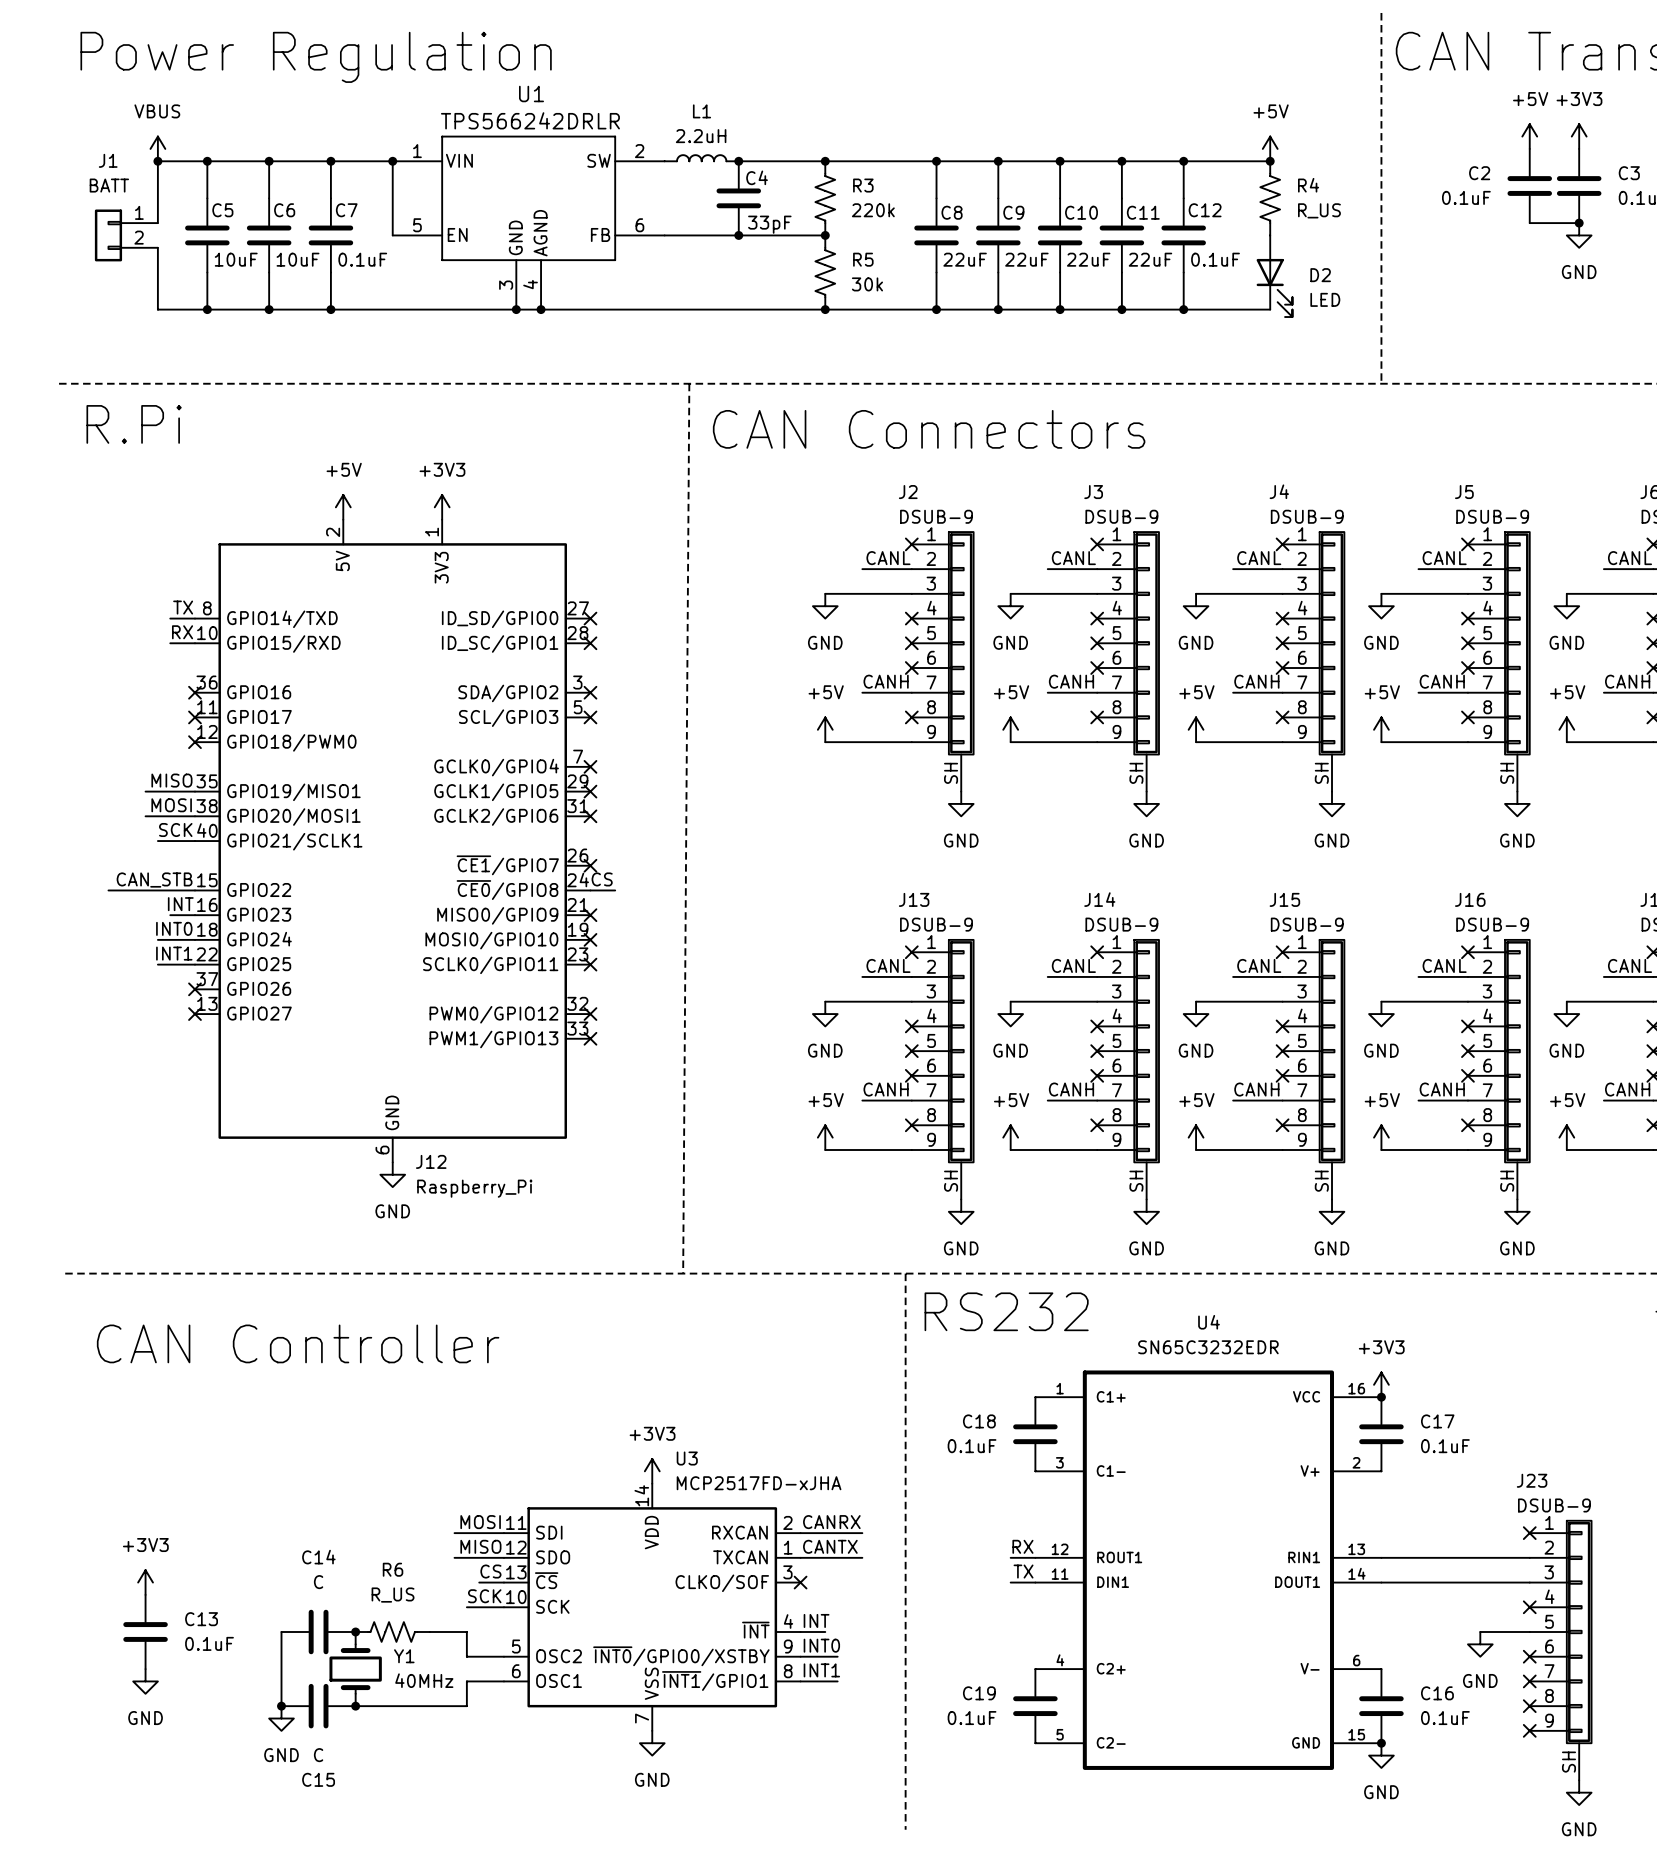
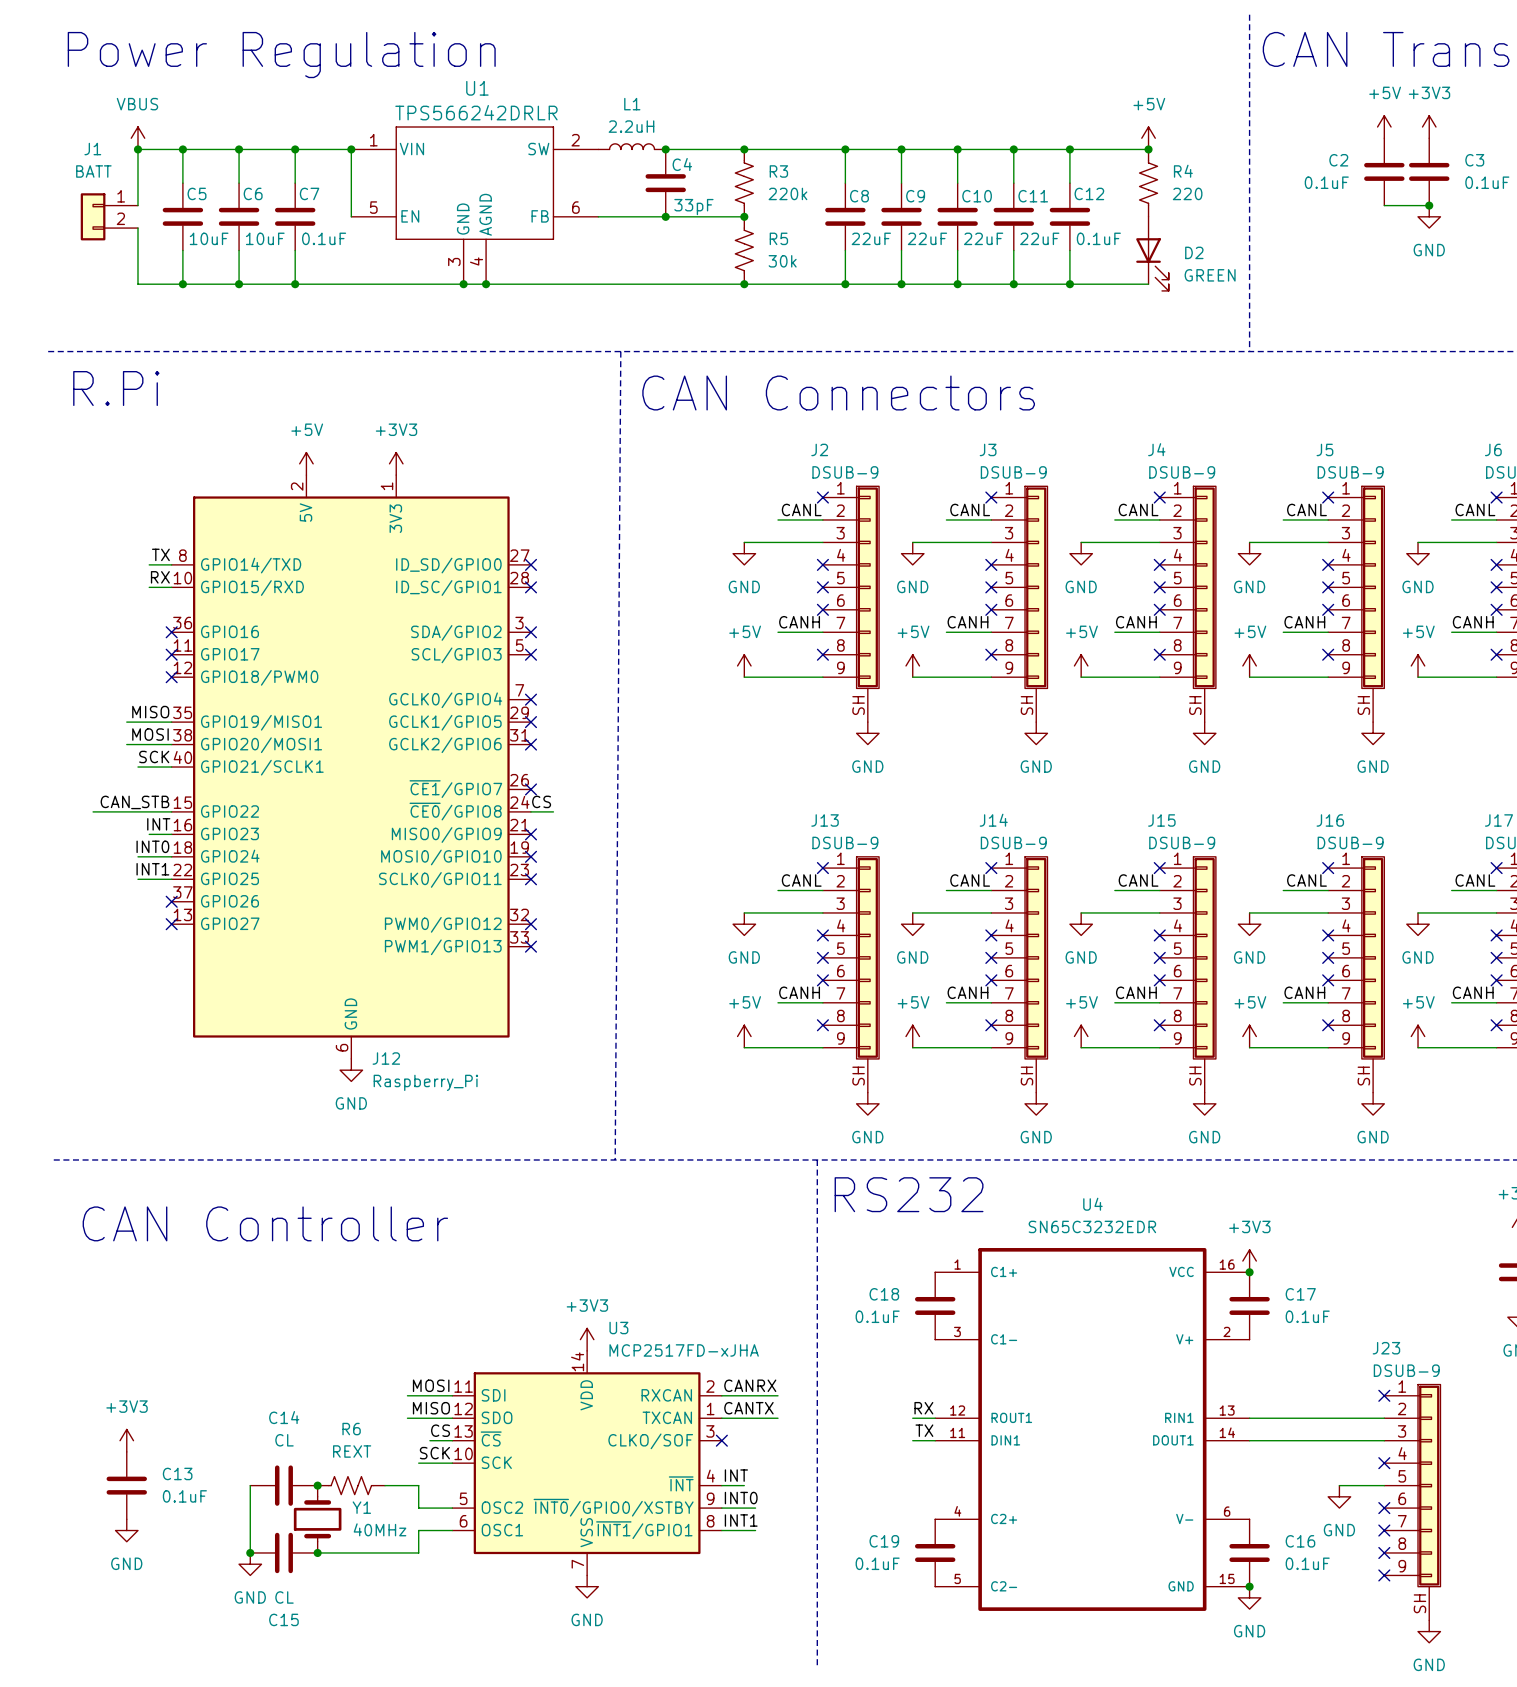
R4 value: R_US (1319, 210) -> 220 (1187, 193)
D2 value: LED (1325, 299) -> GREEN (1210, 275)
C14 value: C (318, 1582) -> CL (284, 1440)
R6 value: R_US (393, 1595) -> REXT (352, 1451)
C15 value: C (318, 1755) -> CL (284, 1597)

